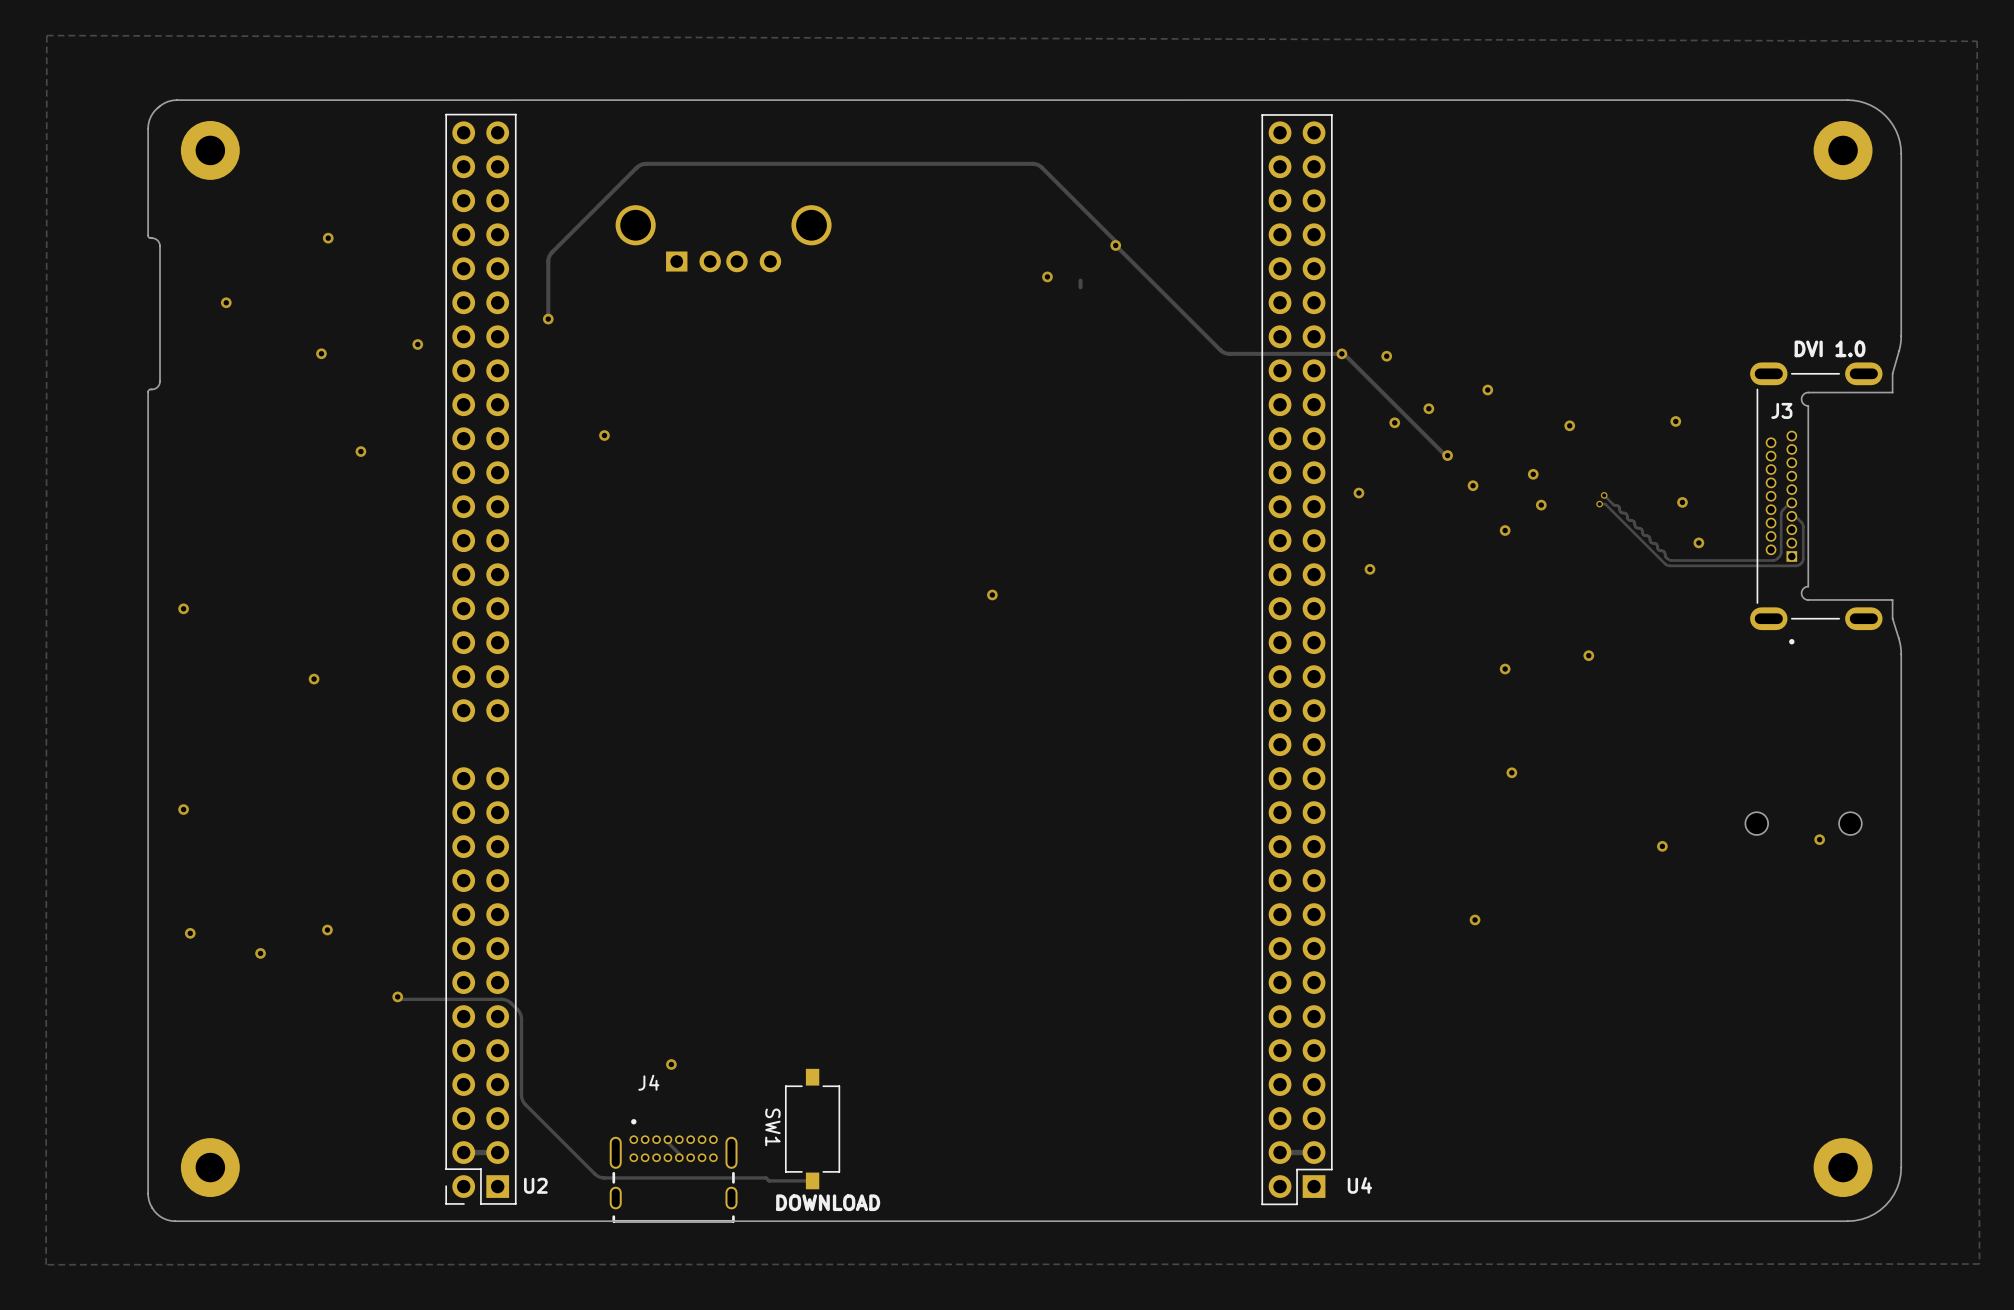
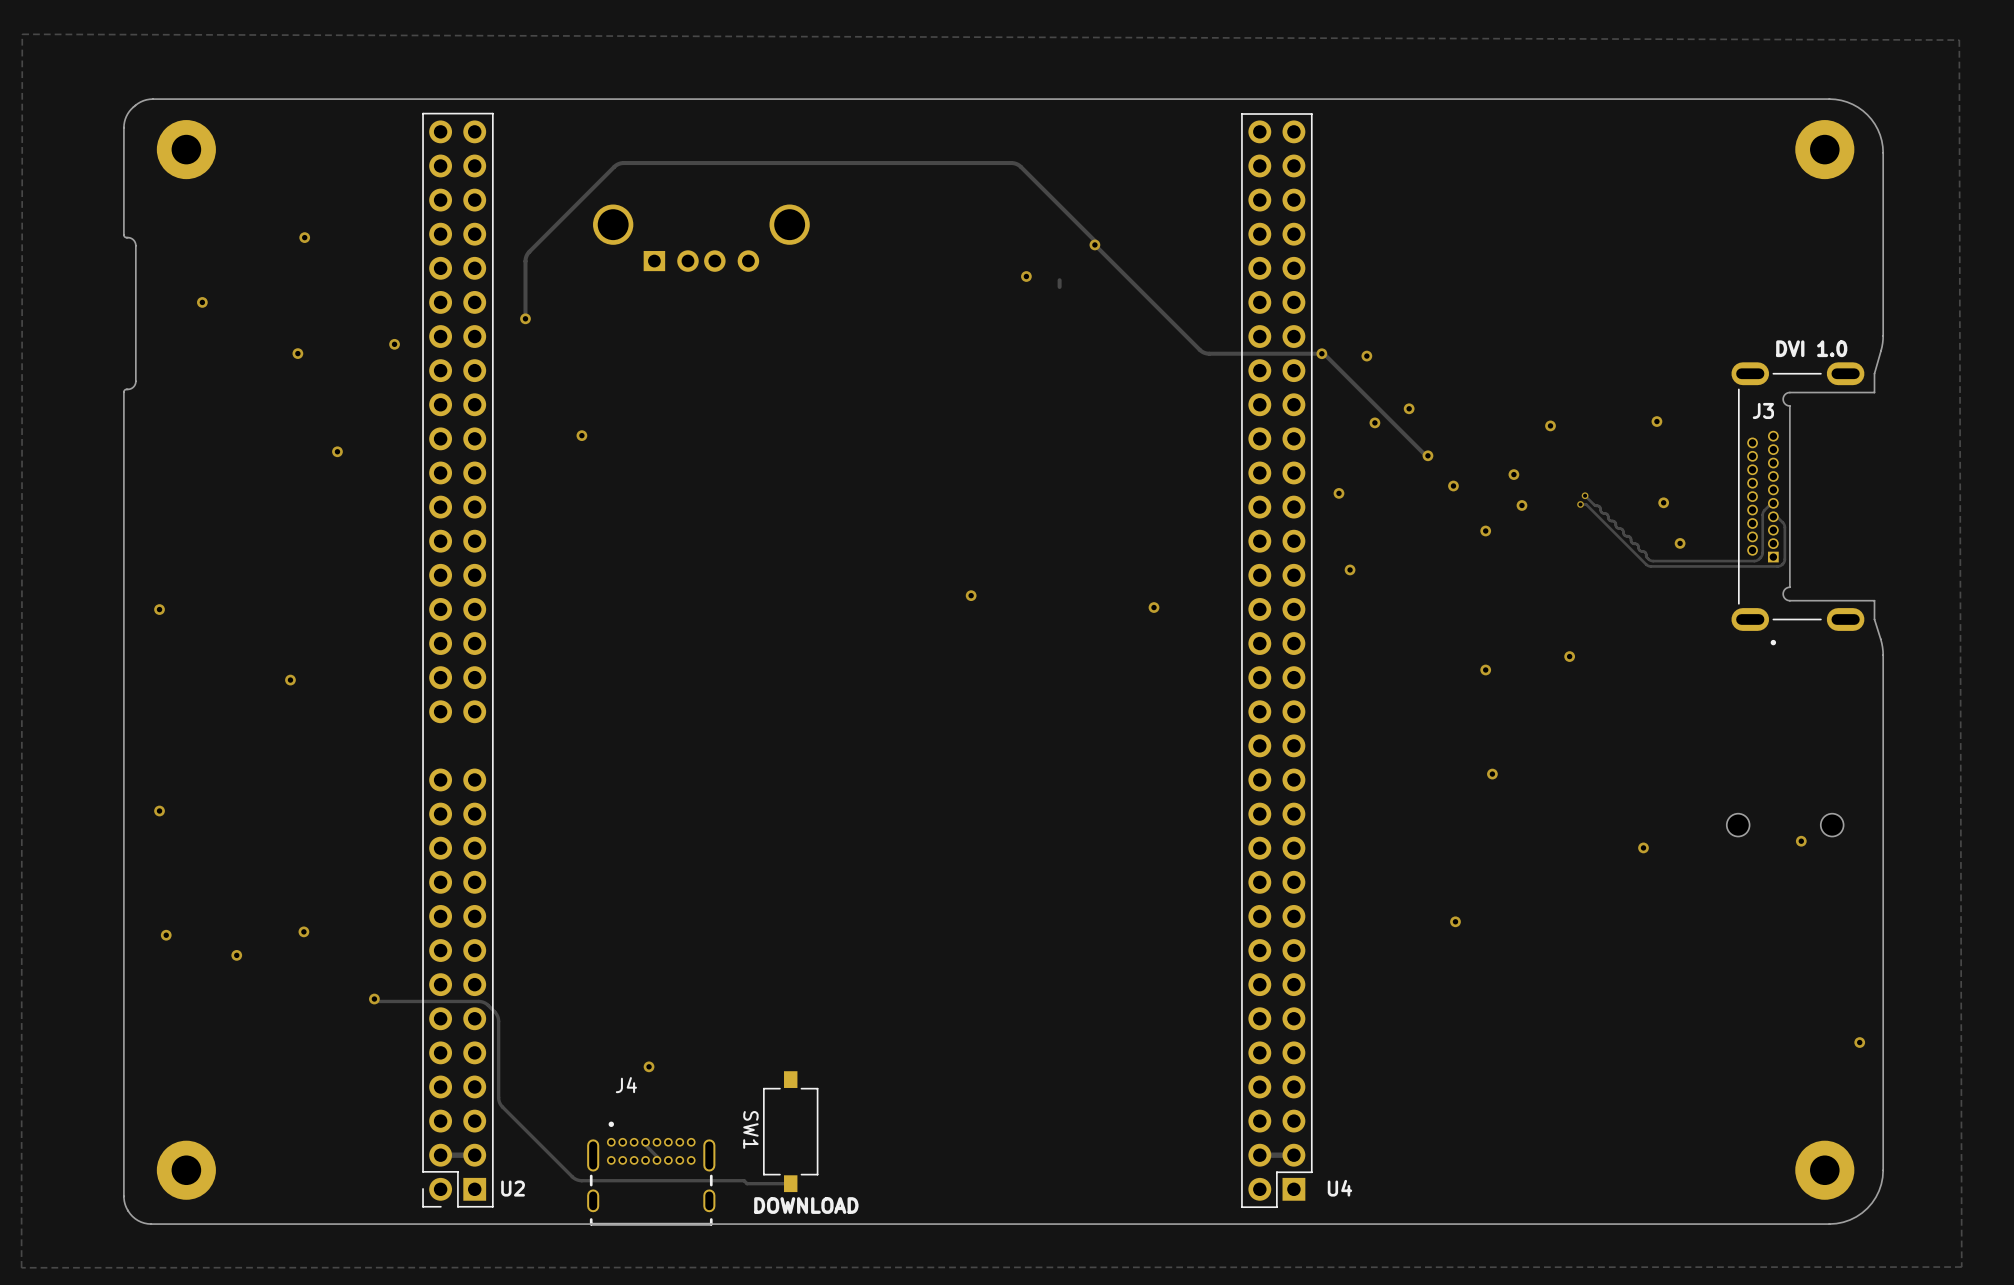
via: (1487, 390) -> none
via: none -> (1153, 607)
via: none -> (1859, 1042)

